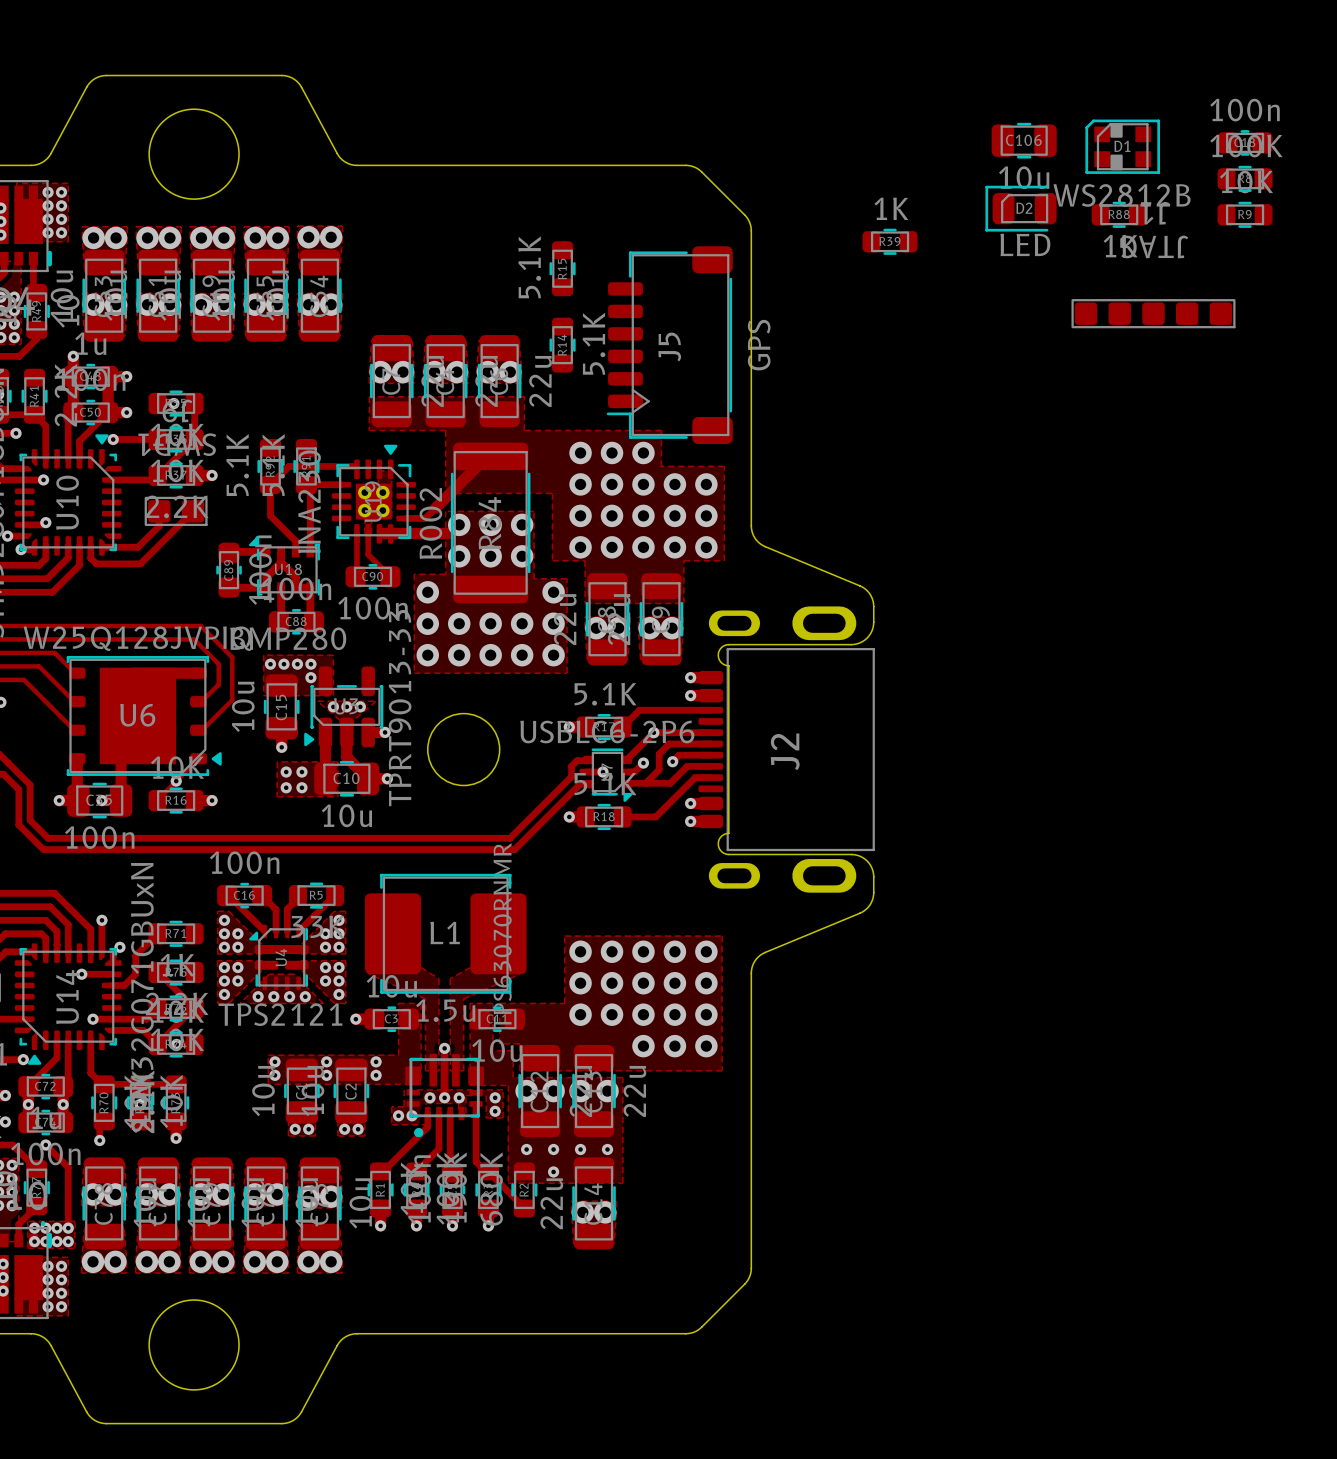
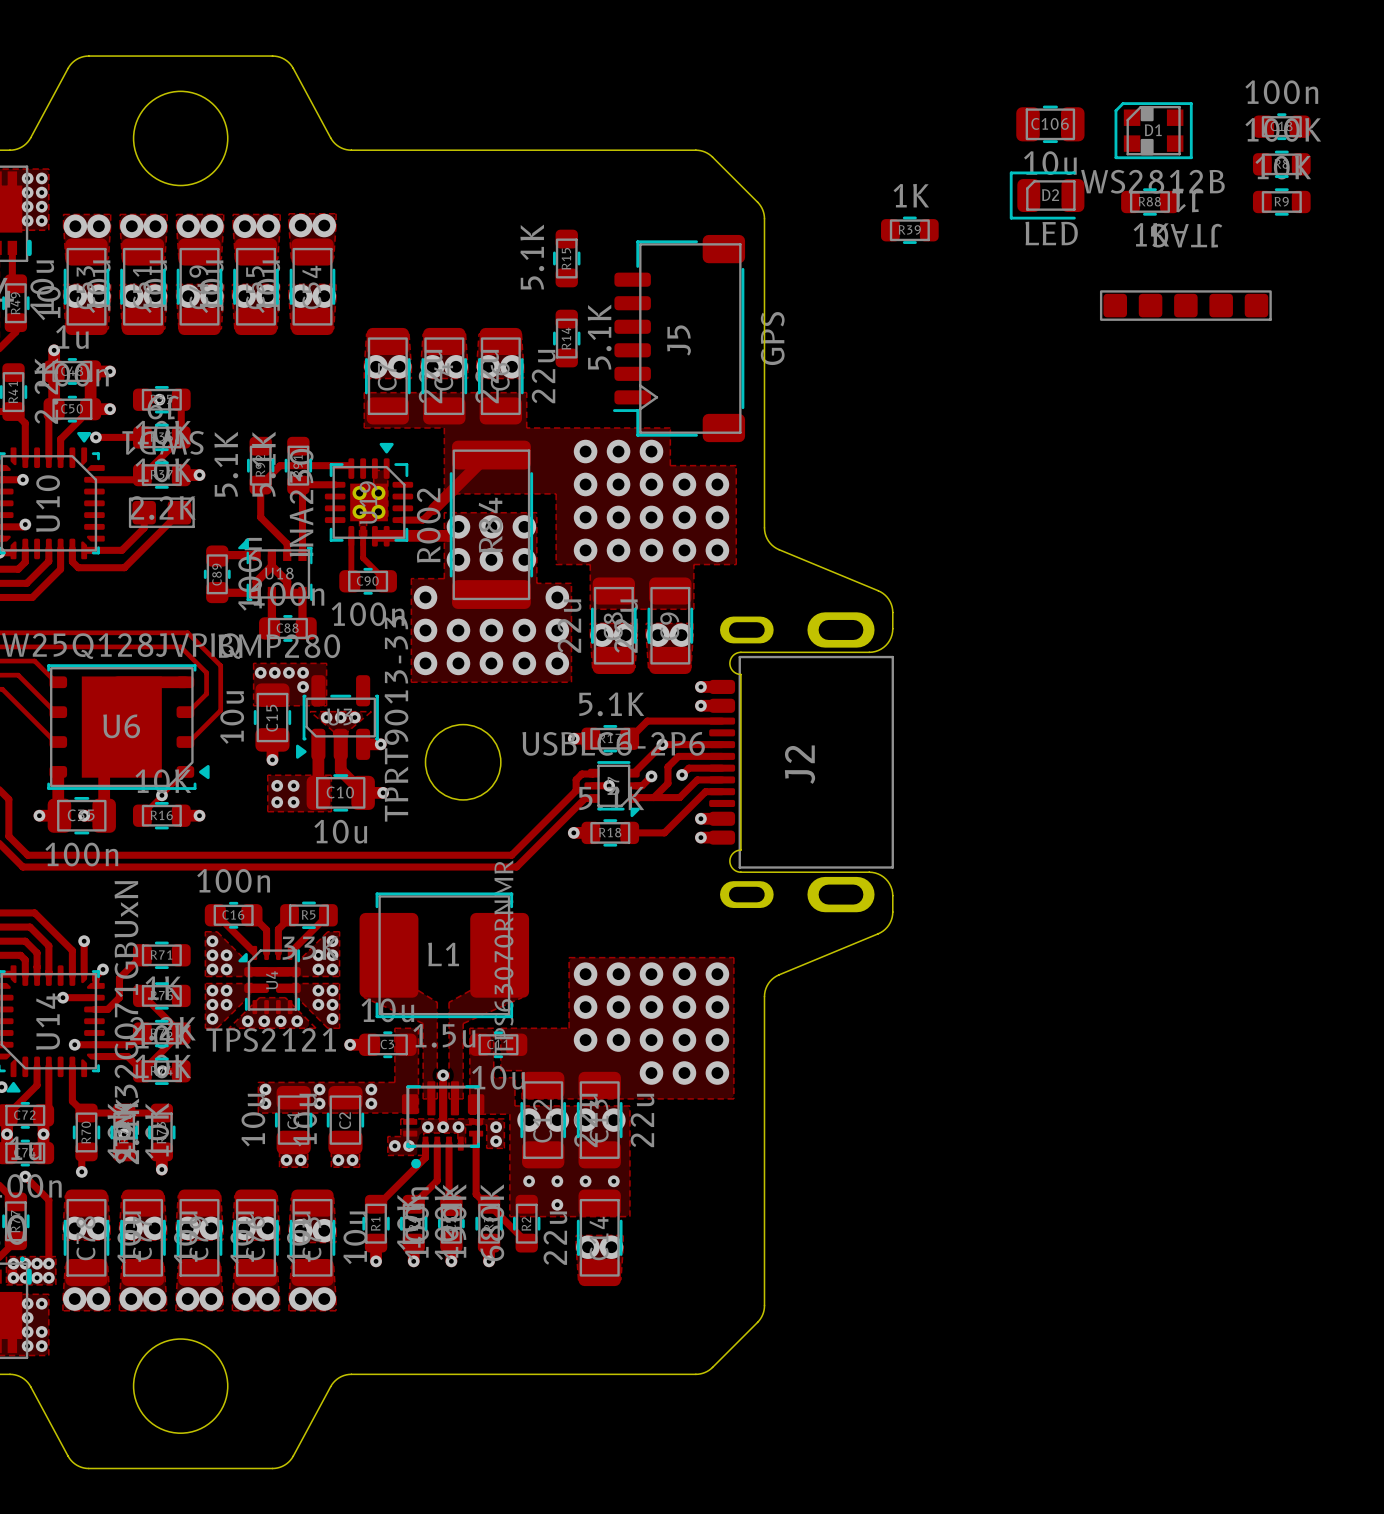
via: (61, 1279) -> none

